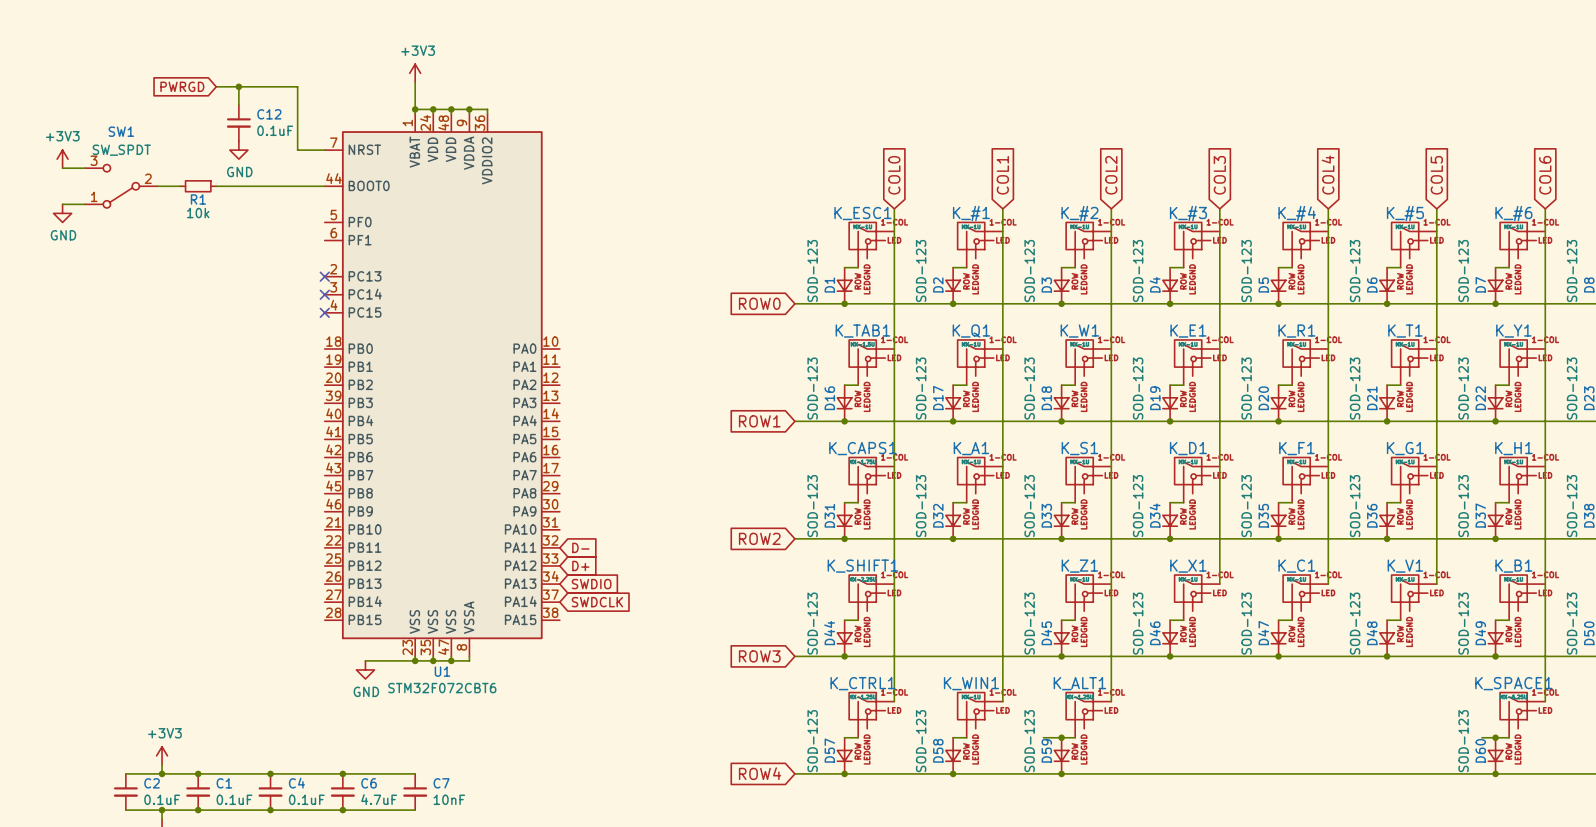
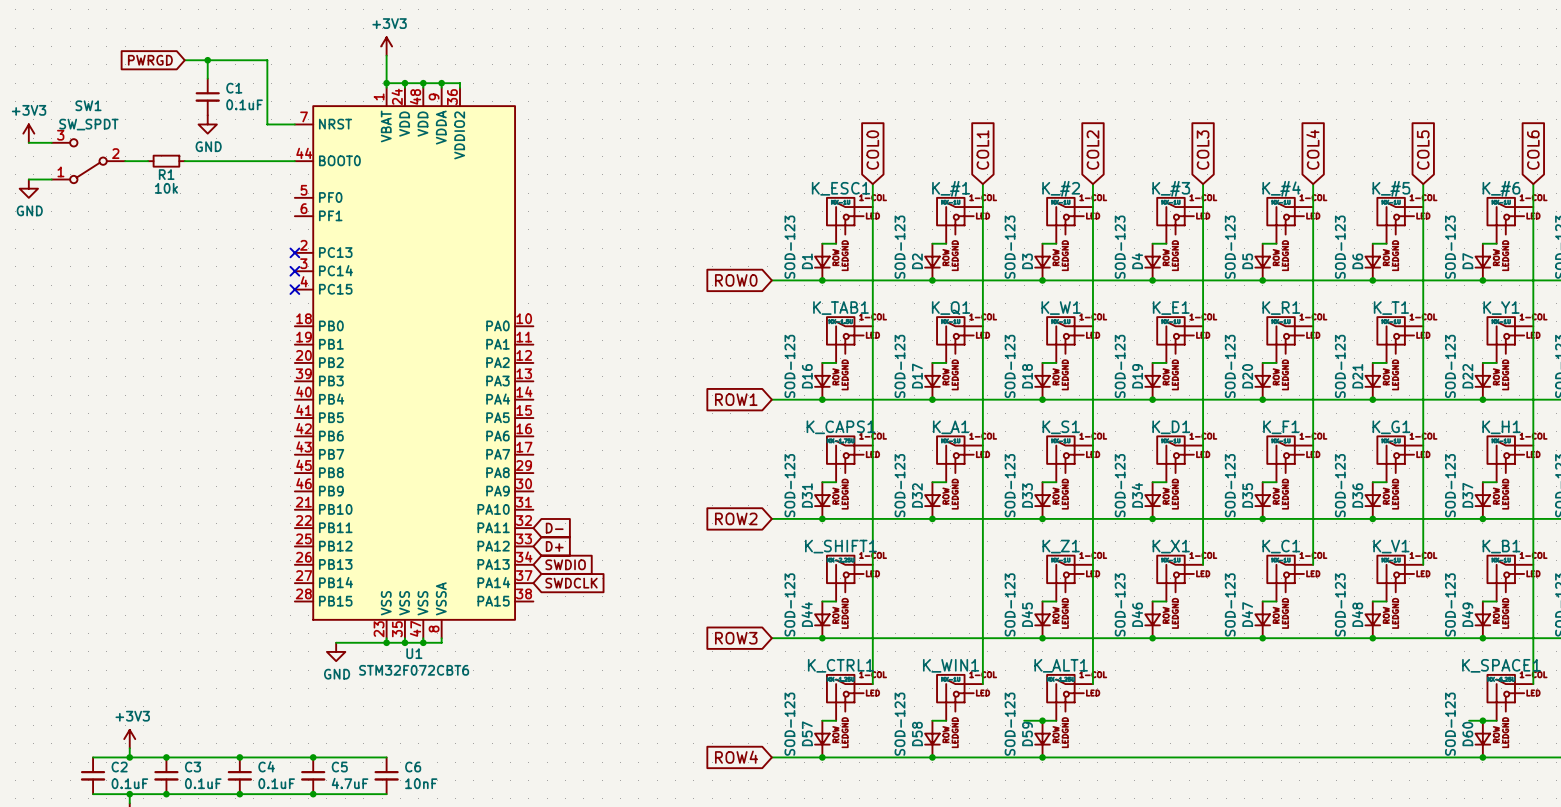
C12 name: C12 (269, 114) -> C1 (234, 88)
C1 name: C1 (224, 783) -> C3 (193, 767)
C6 name: C6 (369, 783) -> C5 (339, 767)
C7 name: C7 (441, 783) -> C6 (413, 767)

